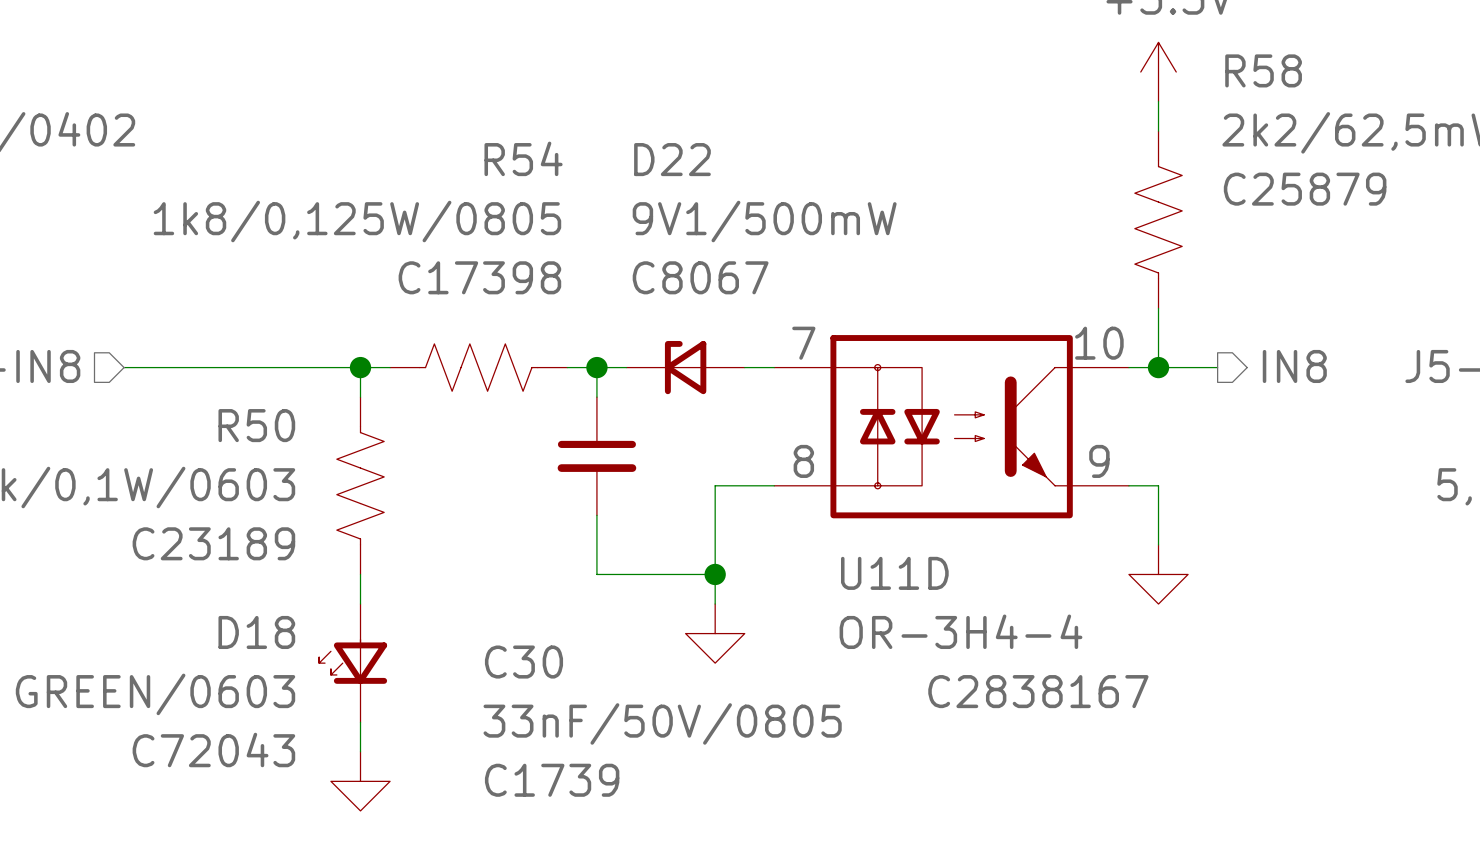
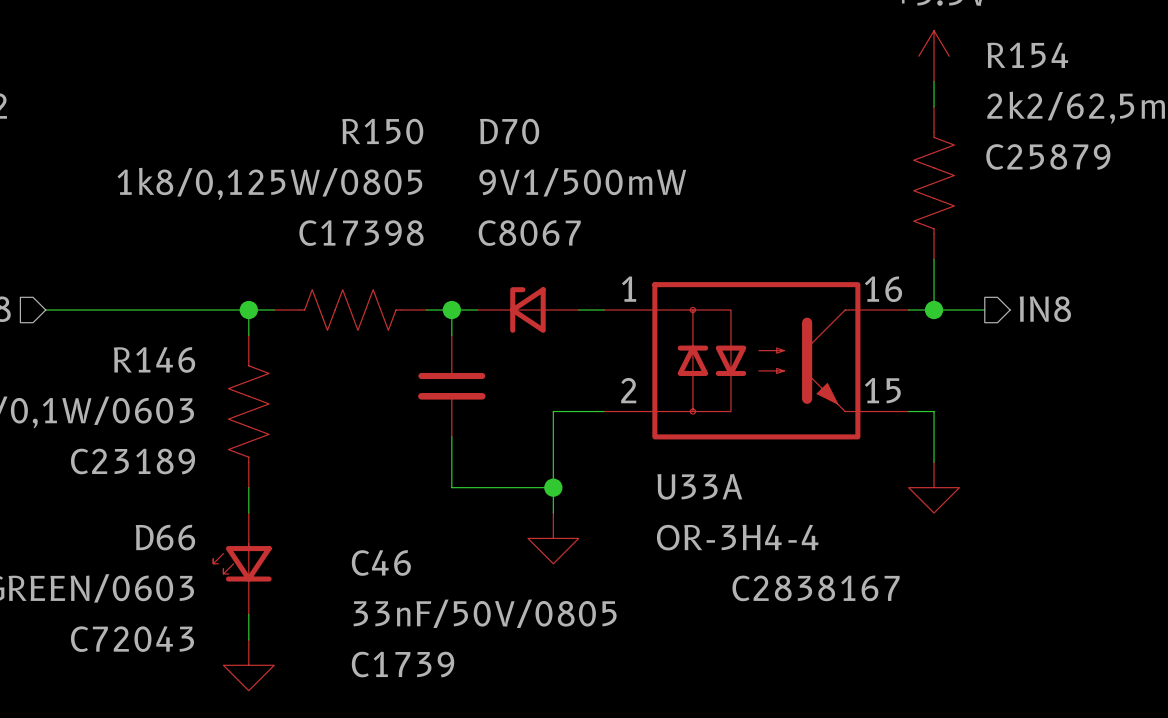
R58 name: R58 (1263, 70) -> R154 (1027, 55)
R54 name: R54 (523, 158) -> R150 (382, 131)
D22 name: D22 (672, 159) -> D70 (509, 131)
U11D pin number: 7 (803, 343) -> 1 (629, 289)
U11D pin number: 10 (1099, 343) -> 16 (883, 289)
R50 name: R50 (256, 425) -> R146 (154, 359)
U11D pin number: 8 (803, 461) -> 2 (628, 390)
U11D pin number: 9 (1099, 461) -> 15 (882, 390)
U11D name: U11D (894, 573) -> U33A (699, 486)
D18 name: D18 (256, 632) -> D66 (165, 537)
C30 name: C30 (523, 662) -> C46 (381, 562)

